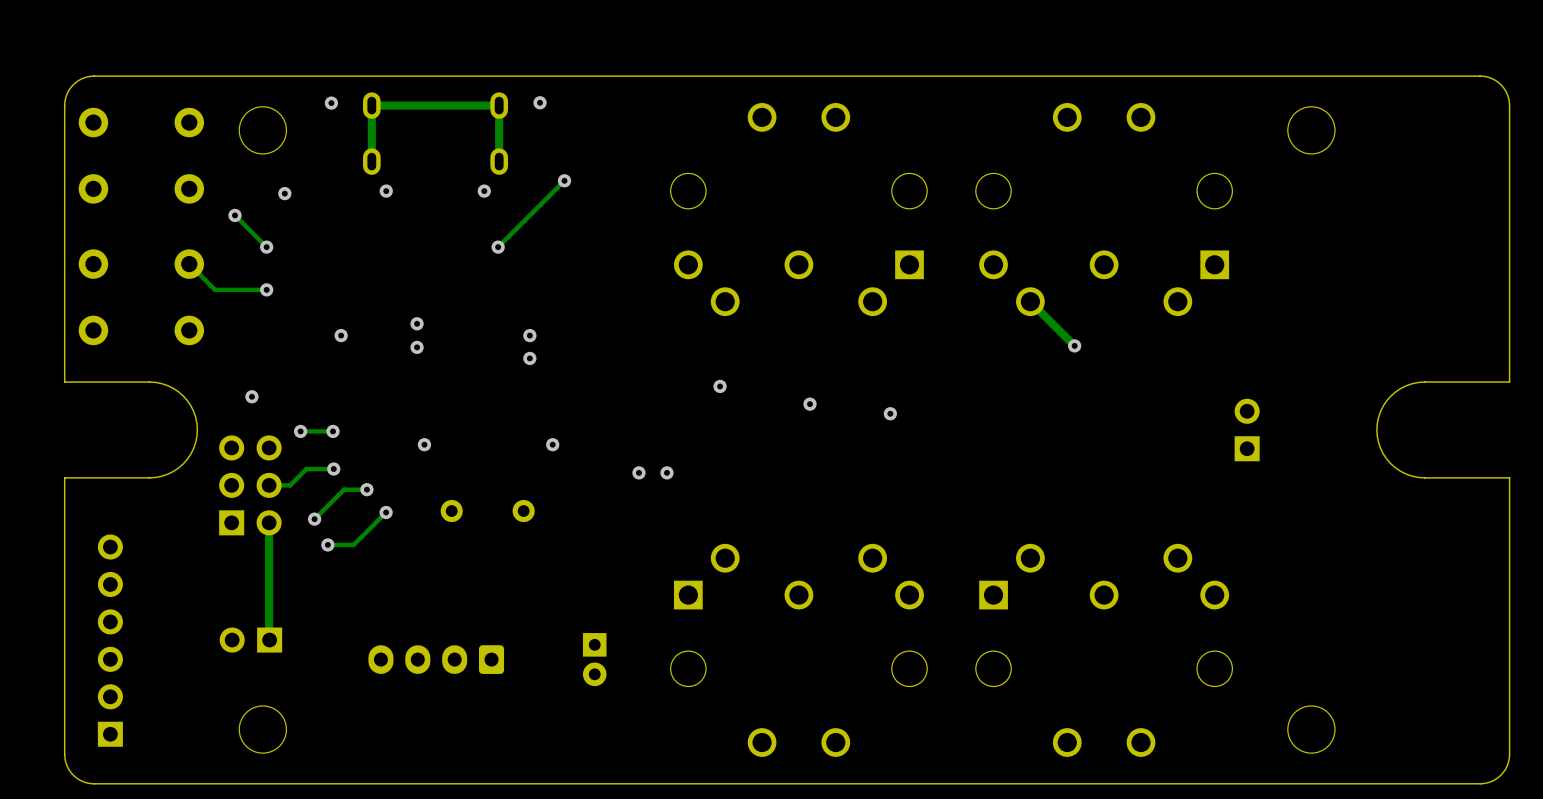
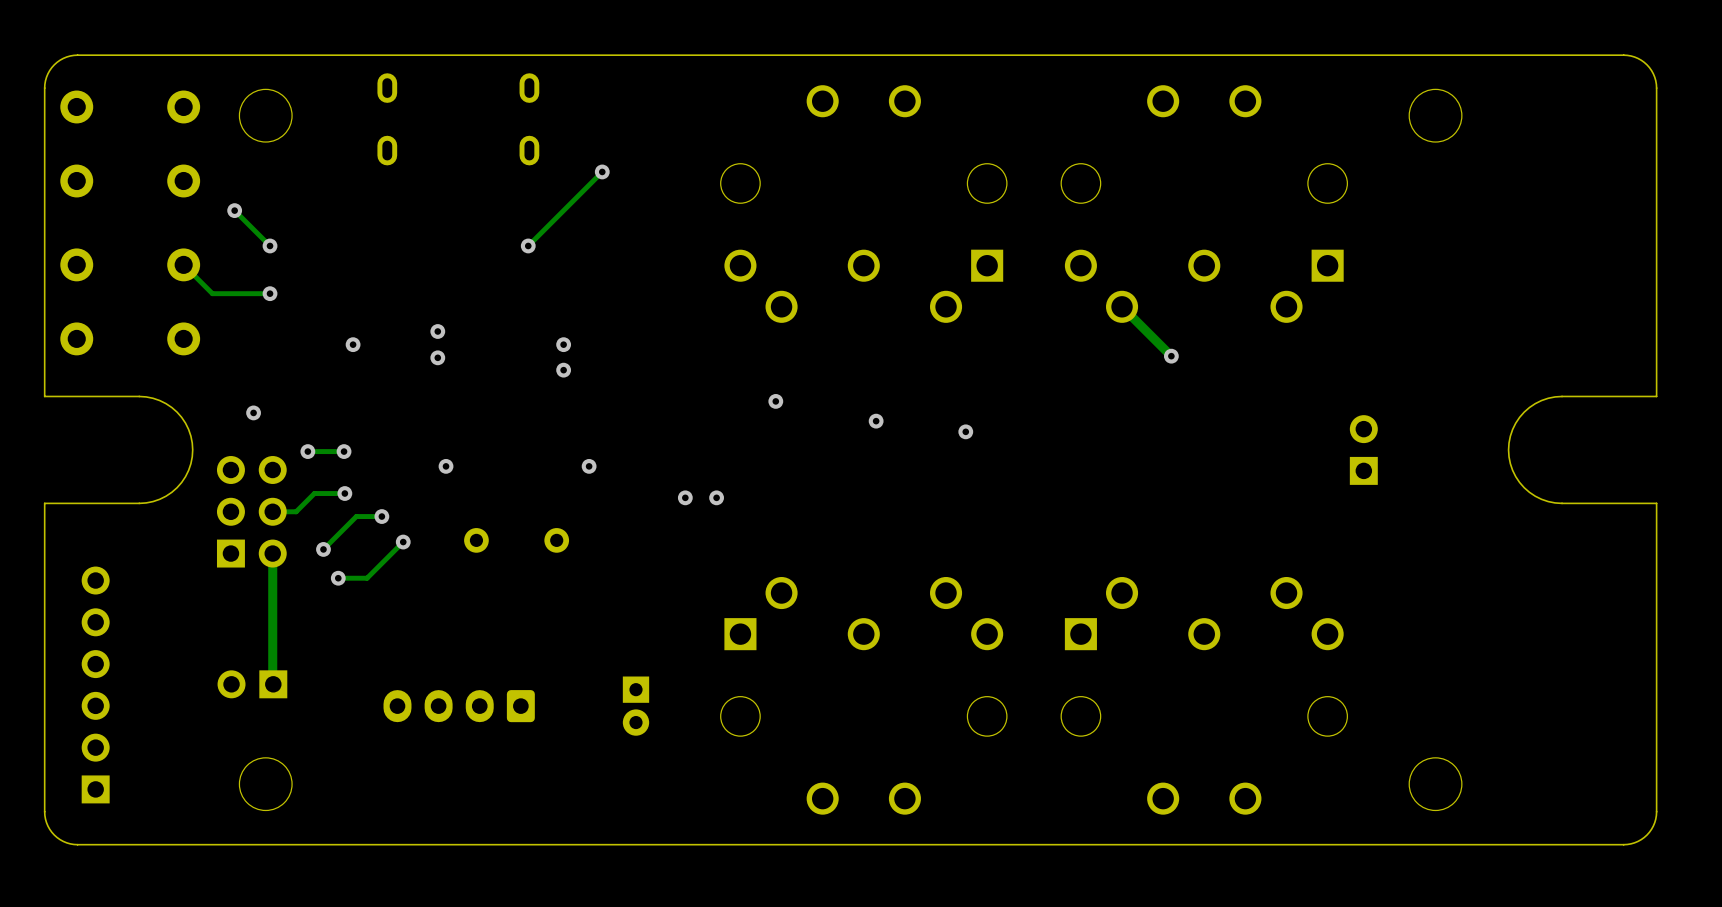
via: (540, 102) -> none
via: (331, 103) -> none
track: (499, 161) (499, 105) (371, 105) (371, 161) -> none
via: (386, 191) -> none
via: (484, 191) -> none
via: (284, 193) -> none

